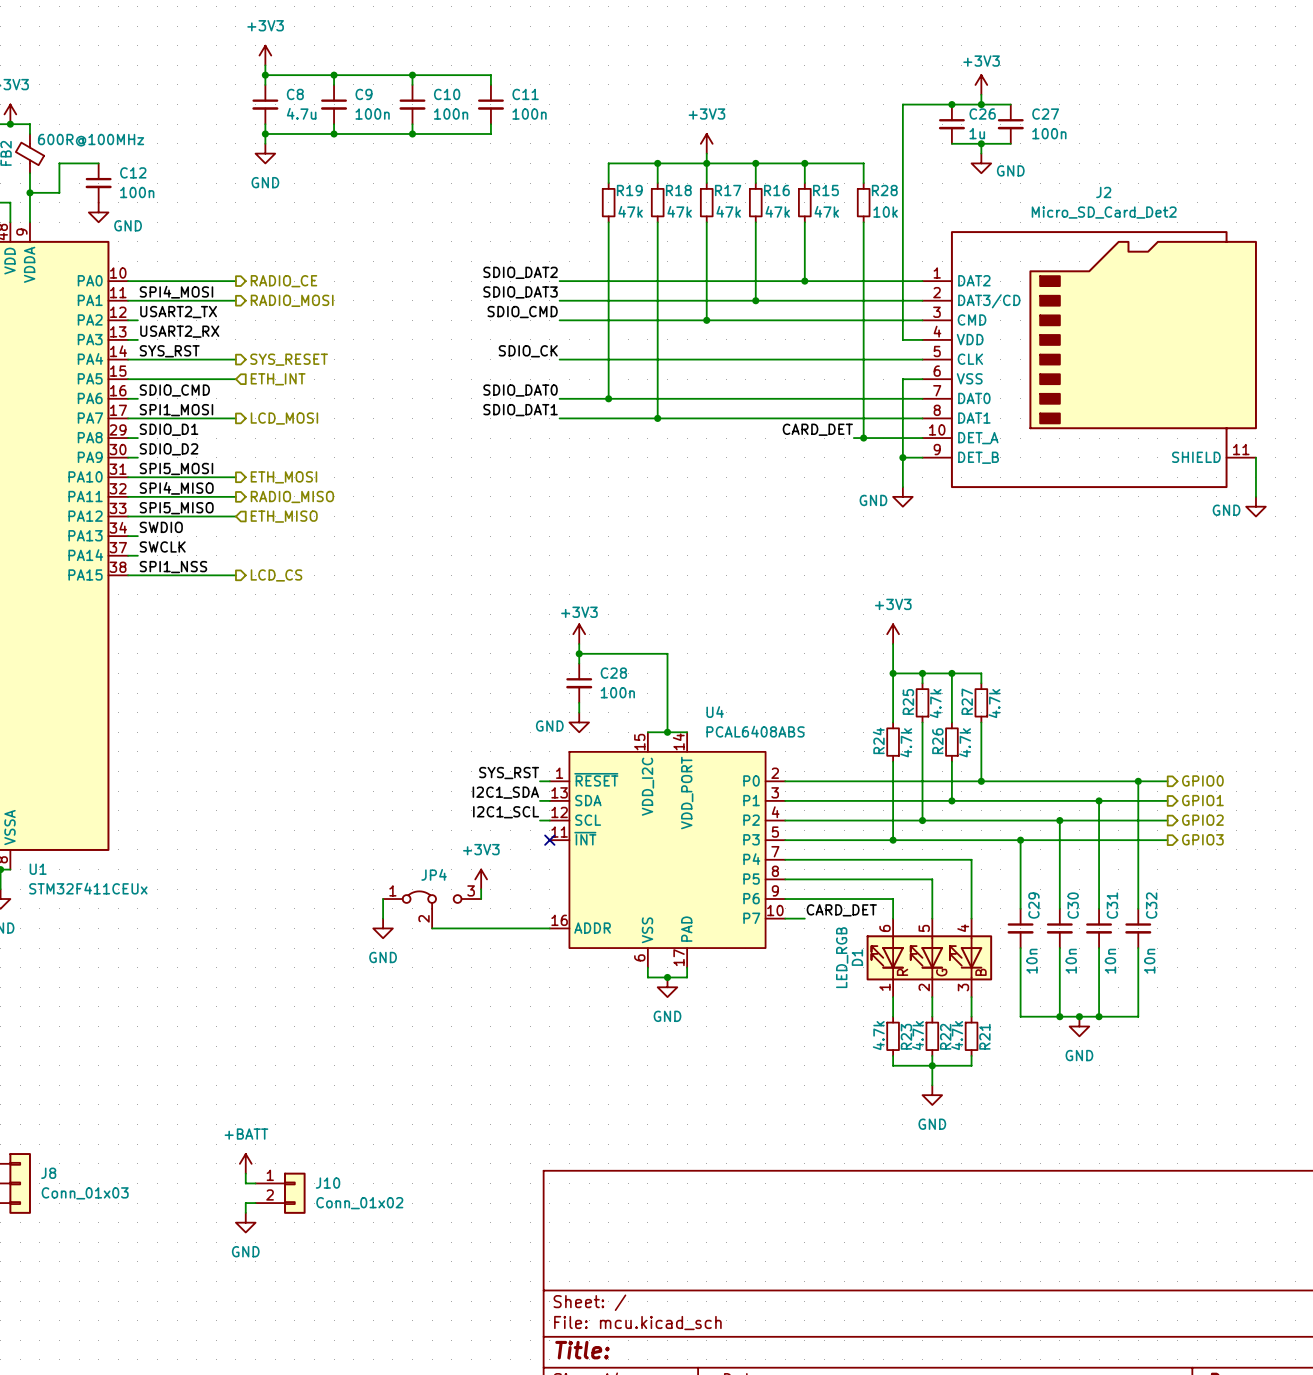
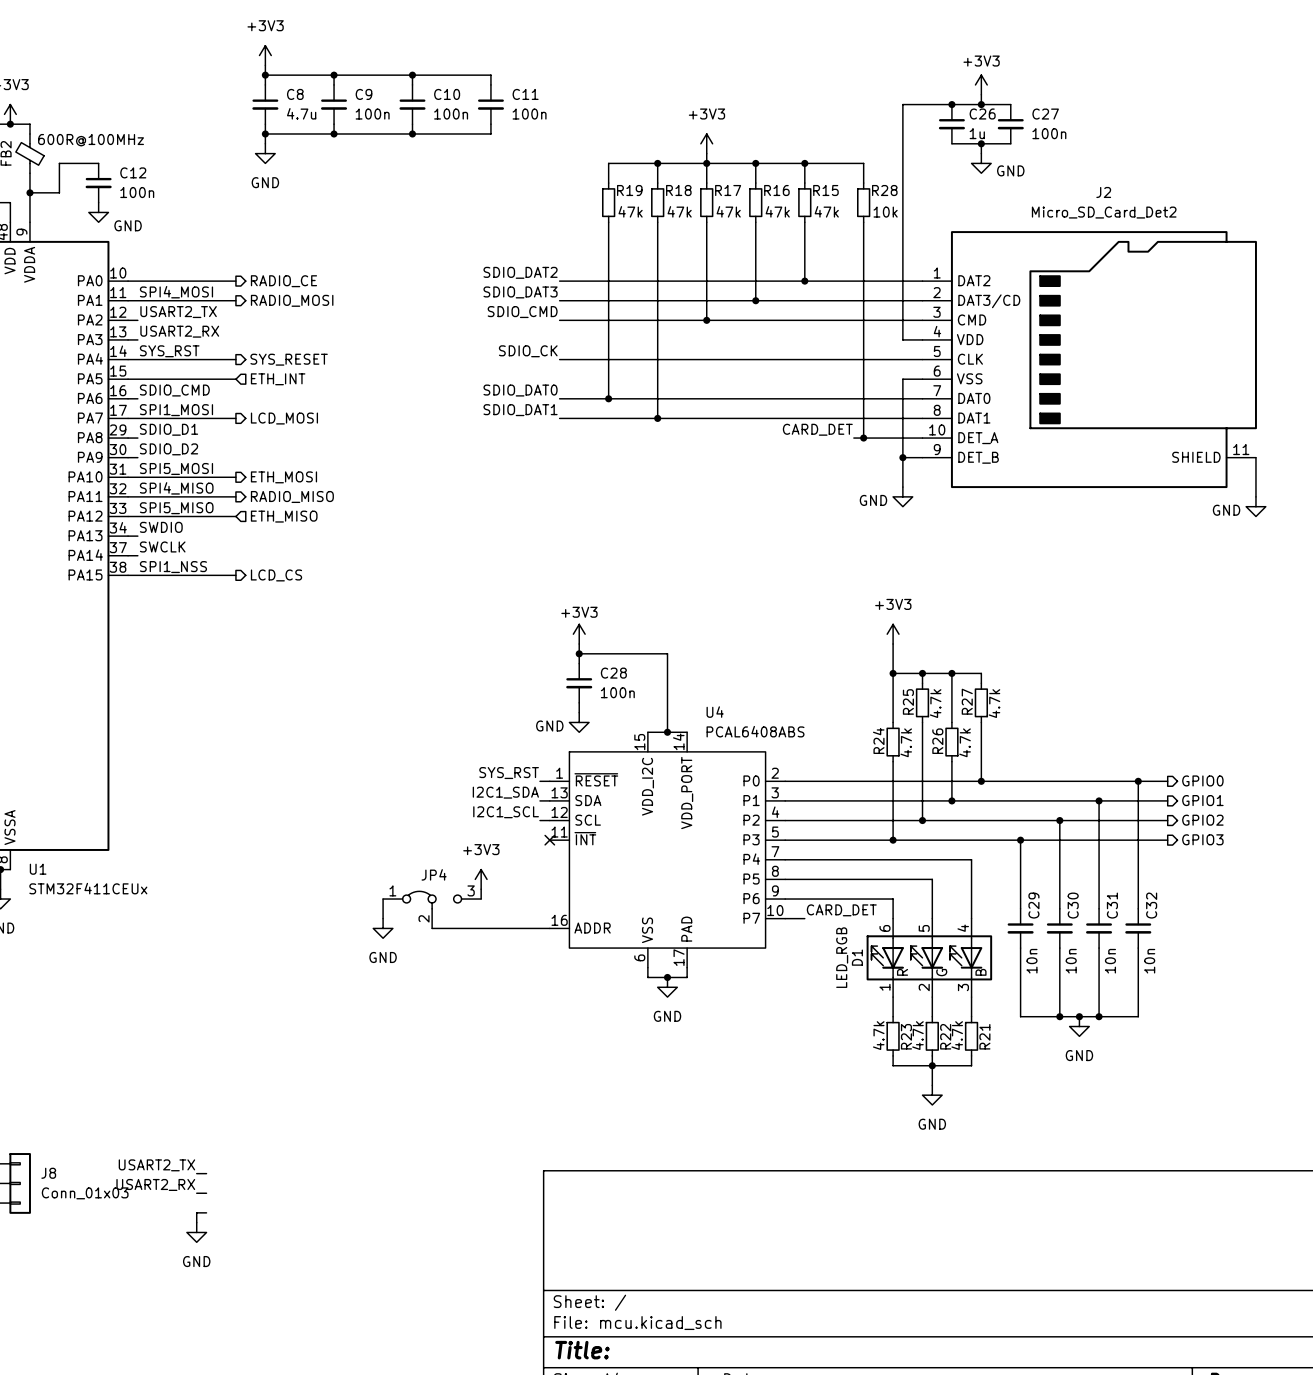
power symbol: +BATT (245, 1163) -> none
label: none -> USART2_TX (156, 1165)
wire: none -> (196, 1173) (206, 1173)
wire: (245, 1173) (245, 1183) (255, 1183) -> none
label: none -> USART2_RX (155, 1184)
wire: none -> (196, 1193) (206, 1193)
J10: Conn_01x02 (280, 1193) -> none
wire: (255, 1203) (245, 1203) (245, 1212) -> (206, 1212) (196, 1212) (196, 1222)
power symbol position: GND (245, 1222) -> GND (196, 1232)

